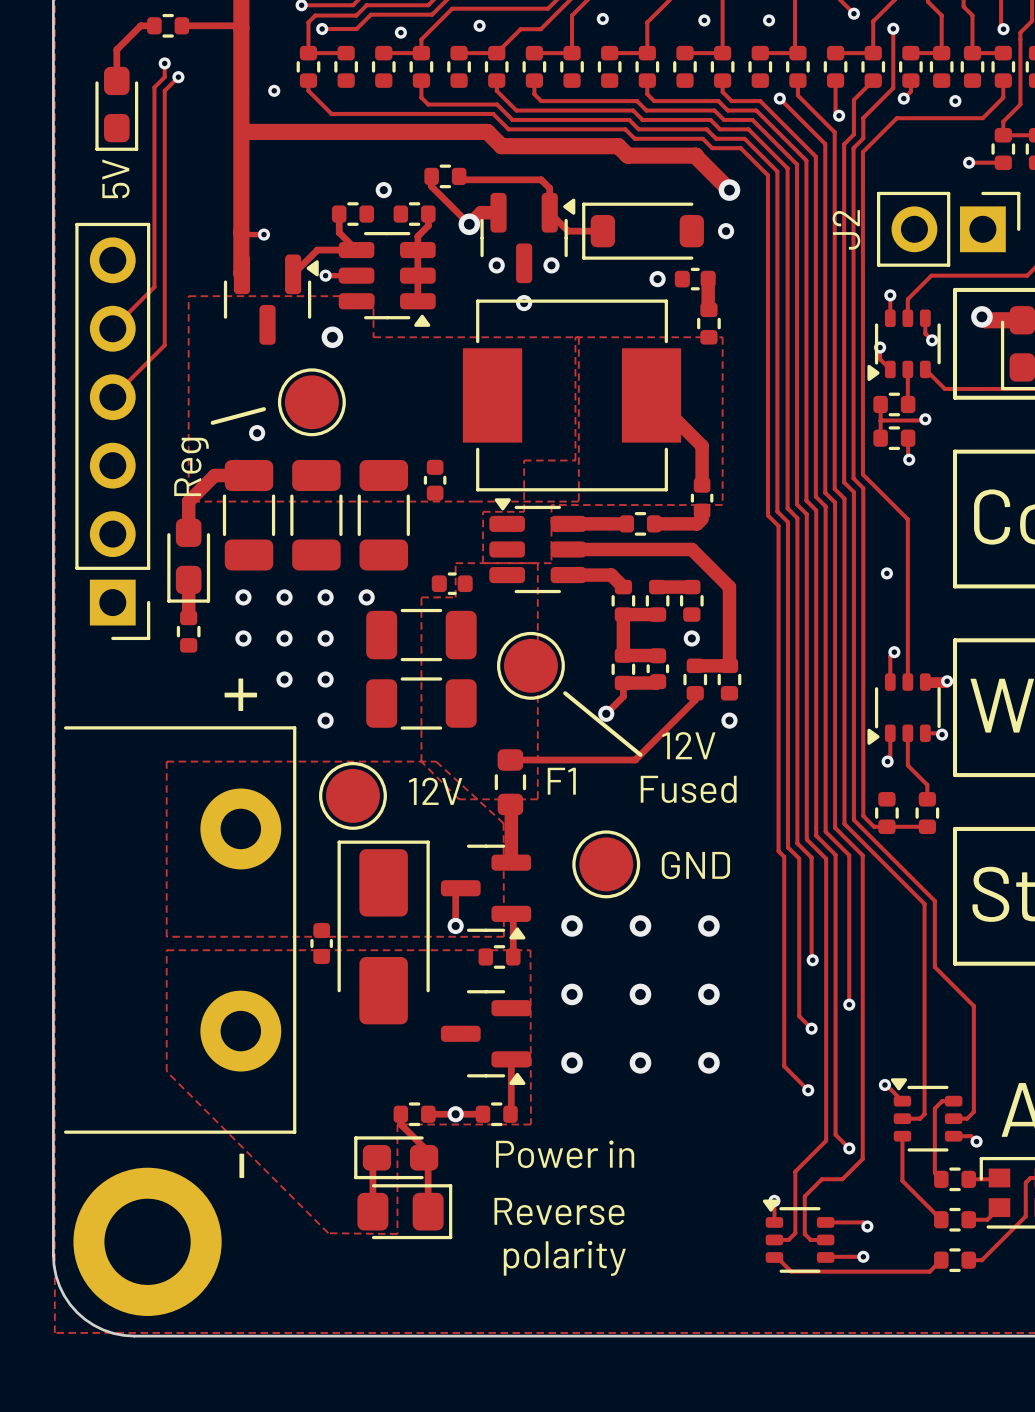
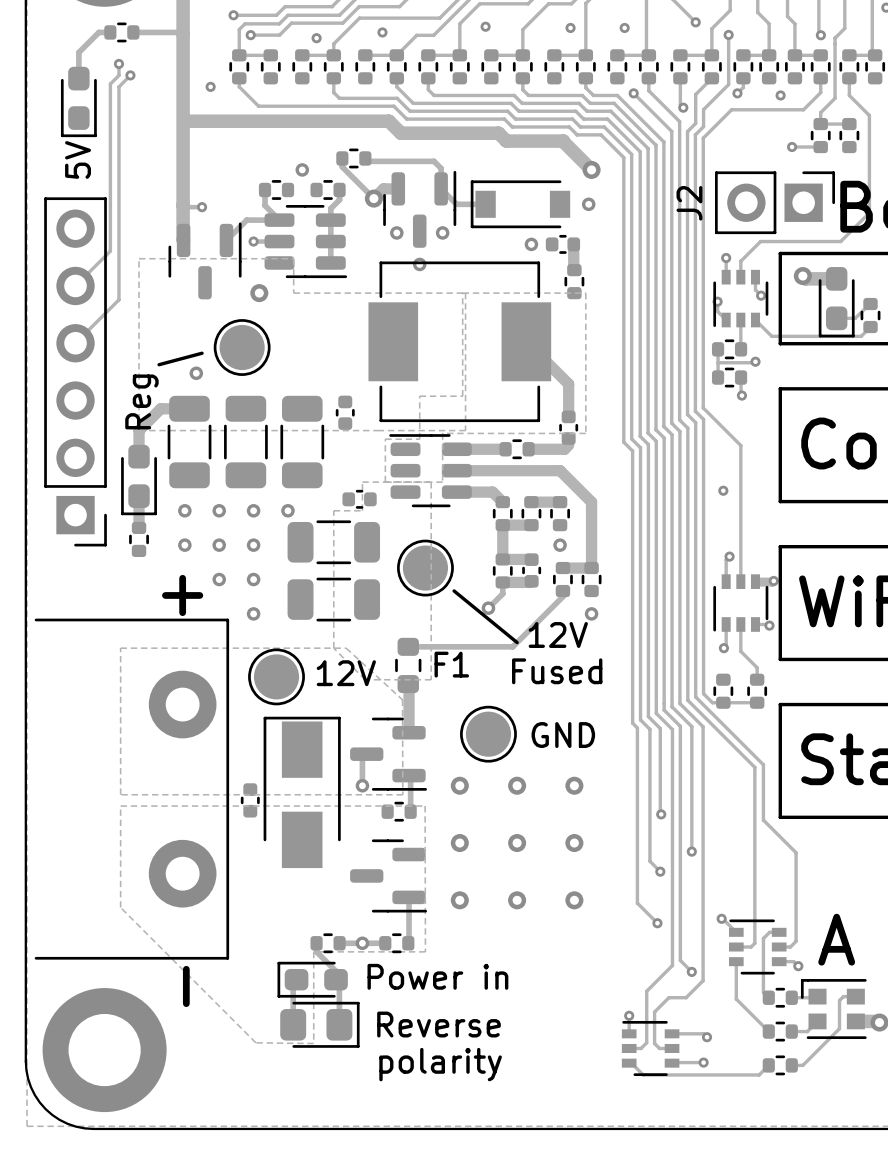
part footprint: [480, 192, 576, 284] -> [383, 170, 457, 248]
part footprint: [582, 202, 704, 260] -> [470, 180, 571, 229]
part footprint: [338, 232, 436, 327] -> [264, 205, 348, 279]
part footprint: [223, 254, 319, 345] -> [168, 222, 242, 300]
part footprint: [867, 309, 941, 382] -> [713, 269, 769, 328]
part footprint: [489, 498, 587, 594] -> [389, 434, 472, 508]
part footprint: [867, 673, 941, 745] -> [713, 574, 769, 632]
part footprint: [337, 840, 430, 1025] -> [263, 716, 341, 869]
part footprint: [440, 844, 532, 940] -> [350, 717, 428, 791]
part footprint: [440, 990, 532, 1085] -> [350, 839, 428, 913]
part footprint: [890, 1078, 963, 1152] -> [728, 919, 787, 975]
part footprint: [762, 1199, 835, 1273] -> [621, 1020, 680, 1077]

